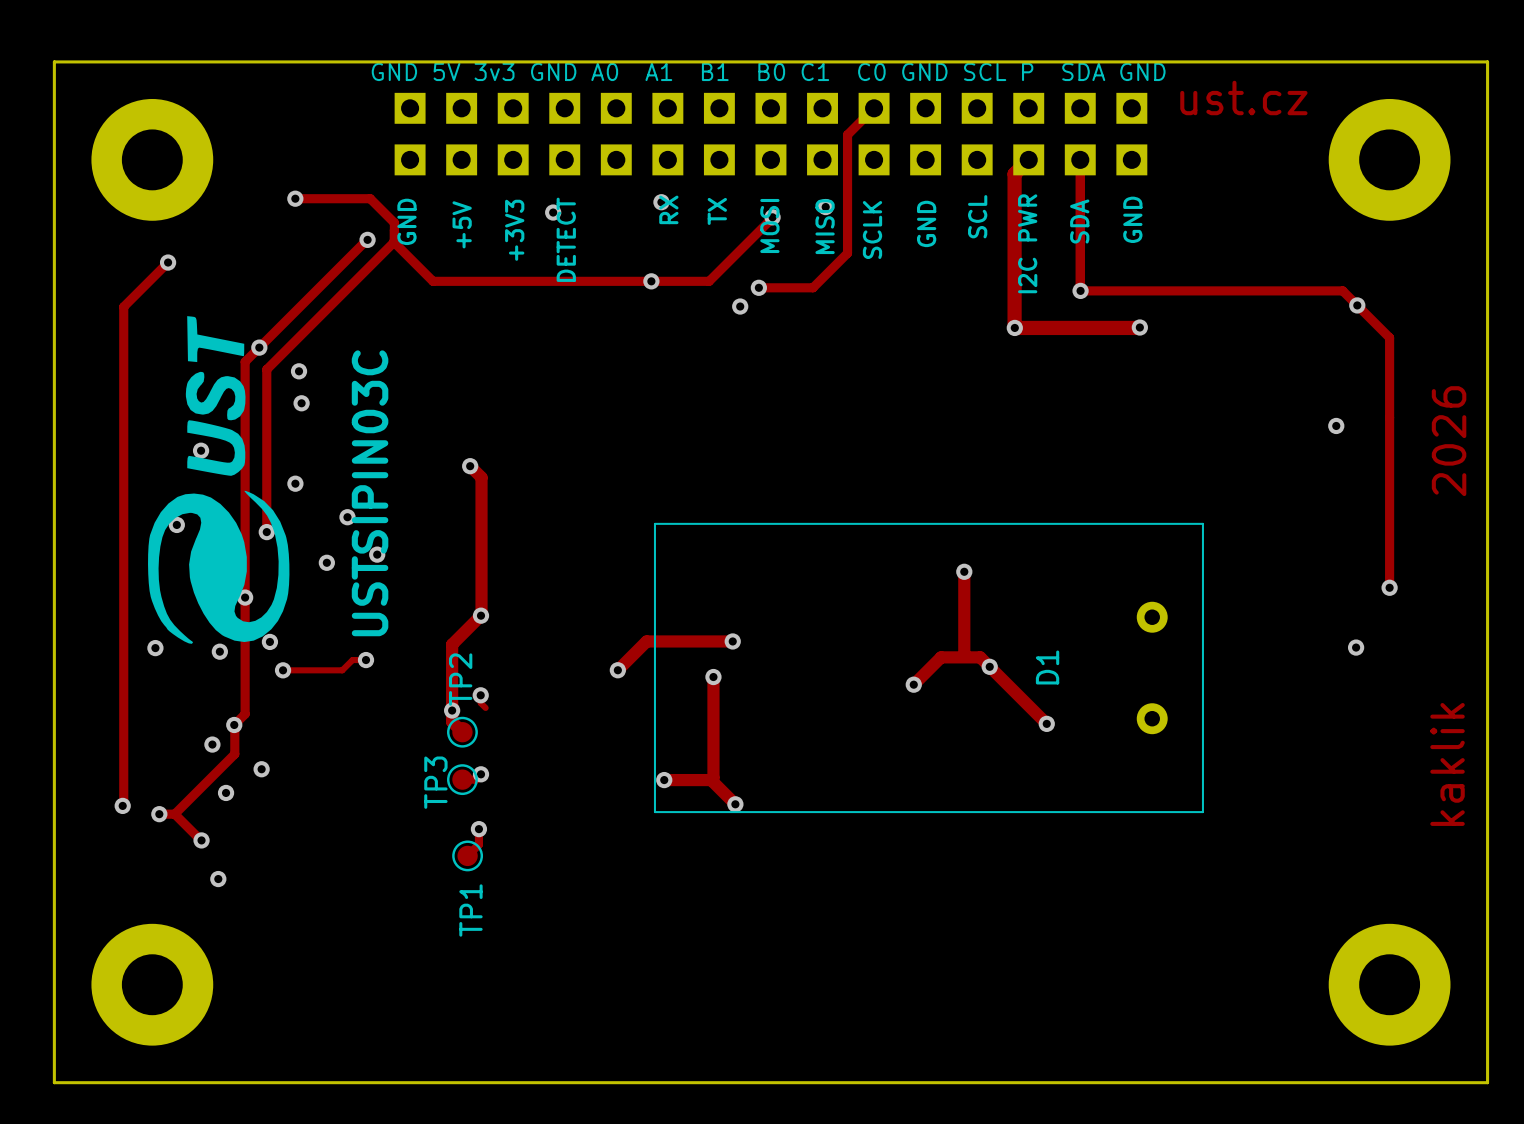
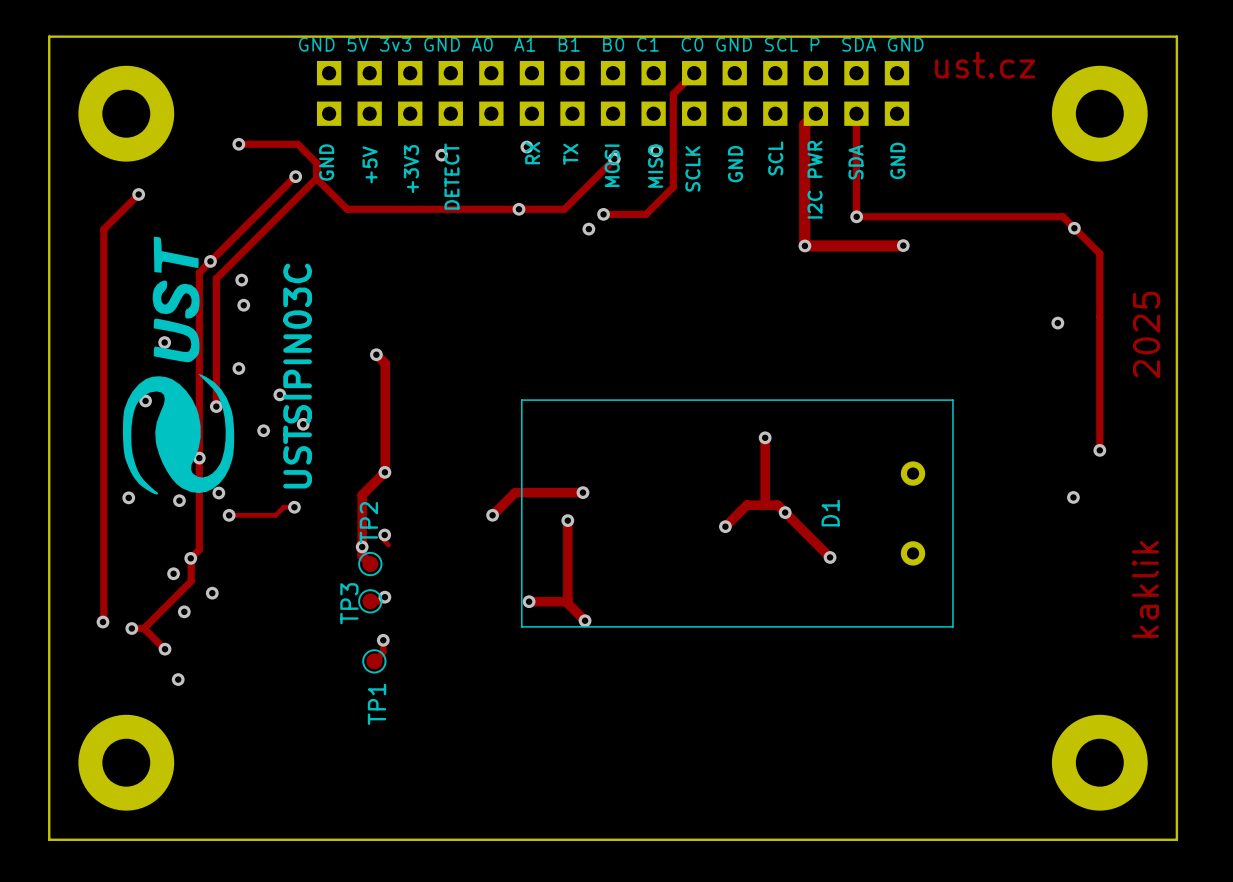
text: 2026 (1449, 441) -> 2025 (1146, 335)

